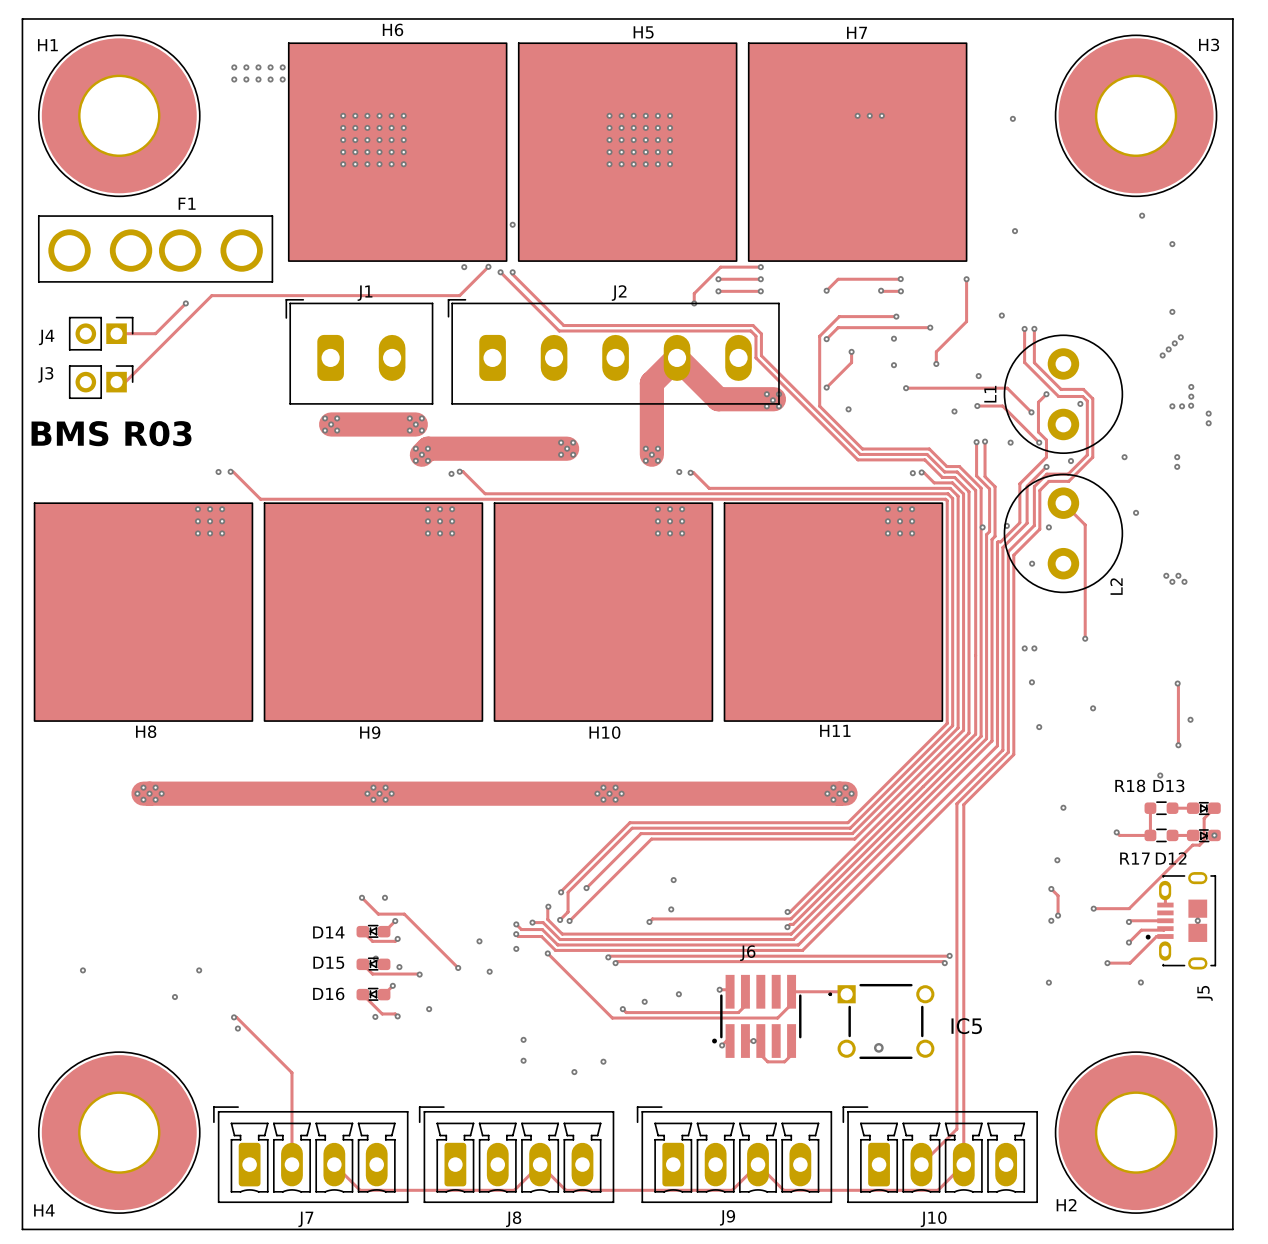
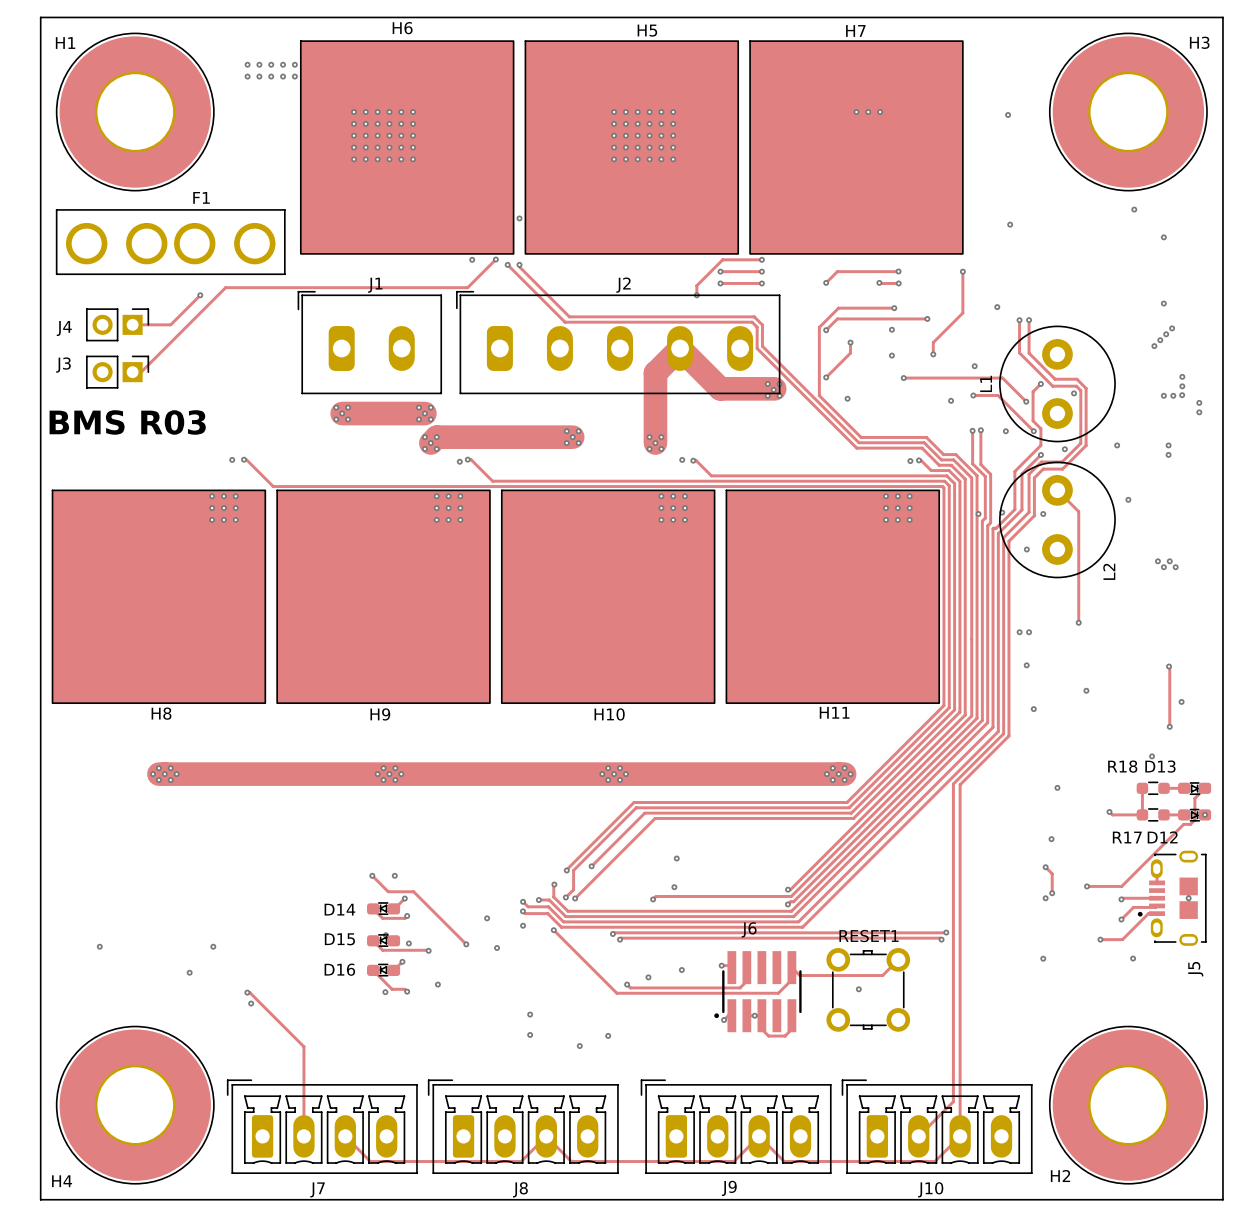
track: (791, 991) (844, 991) (846, 994) -> (791, 967) (799, 975) (882, 975) (898, 959)
via: none -> (858, 989)
RESET1: none -> (868, 989)
IC5: (881, 1021) -> none
via: (878, 1047) -> none

